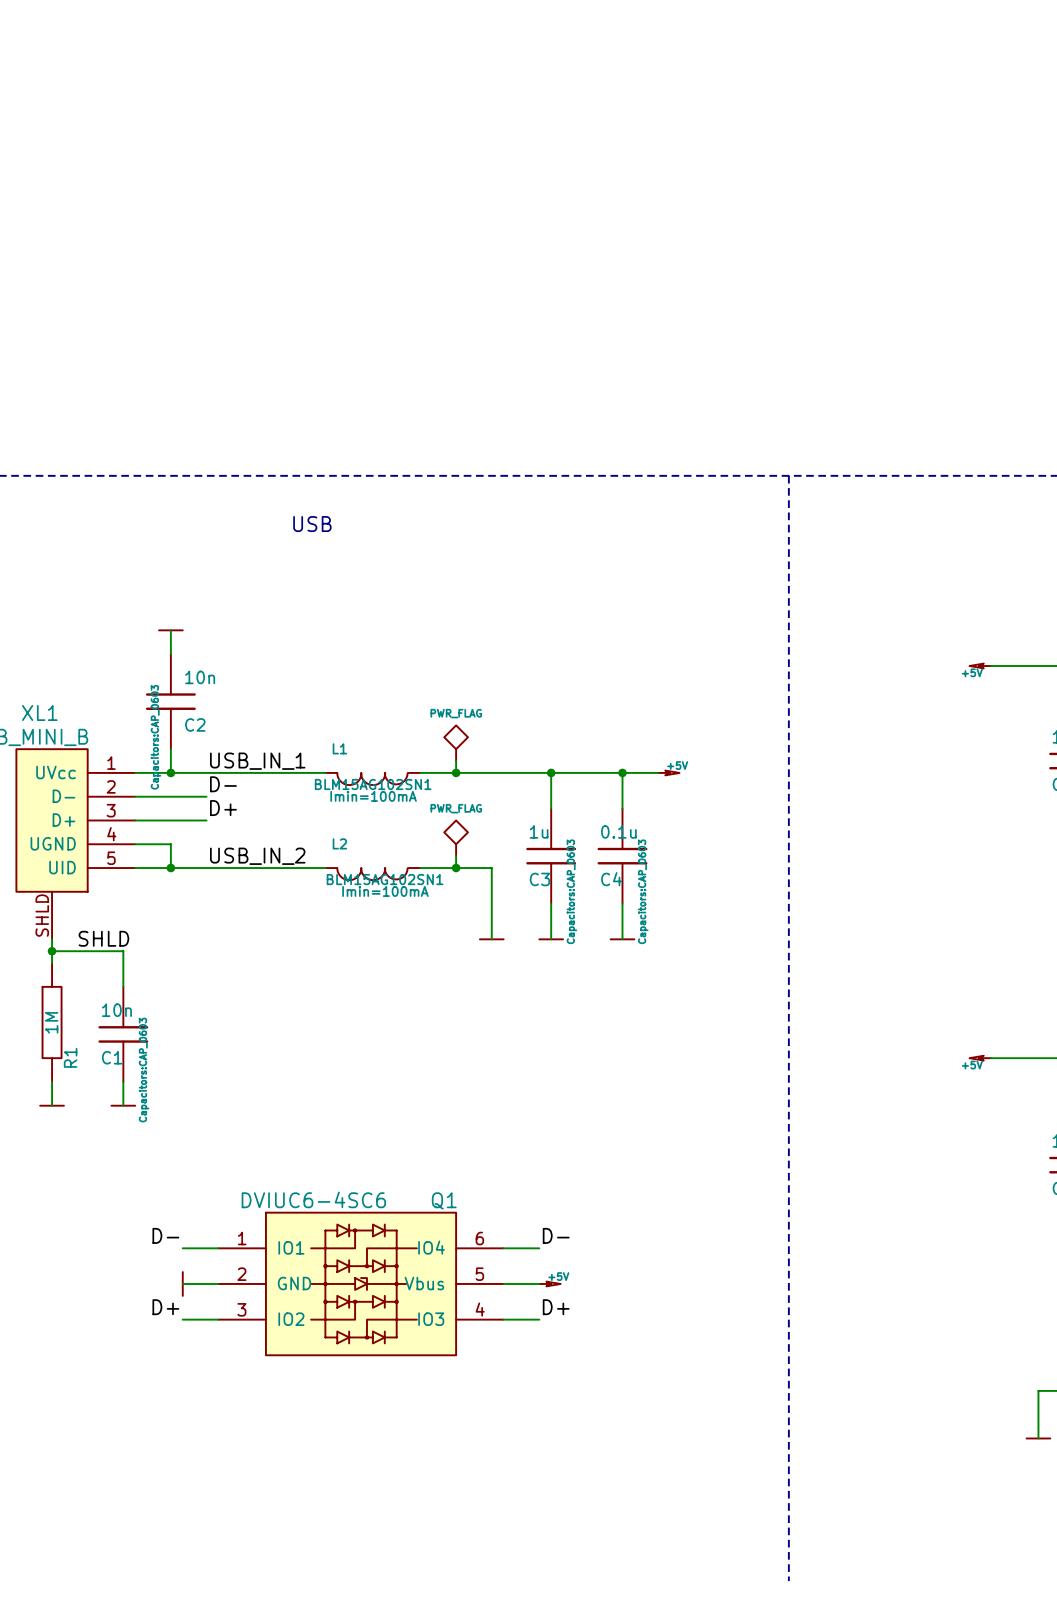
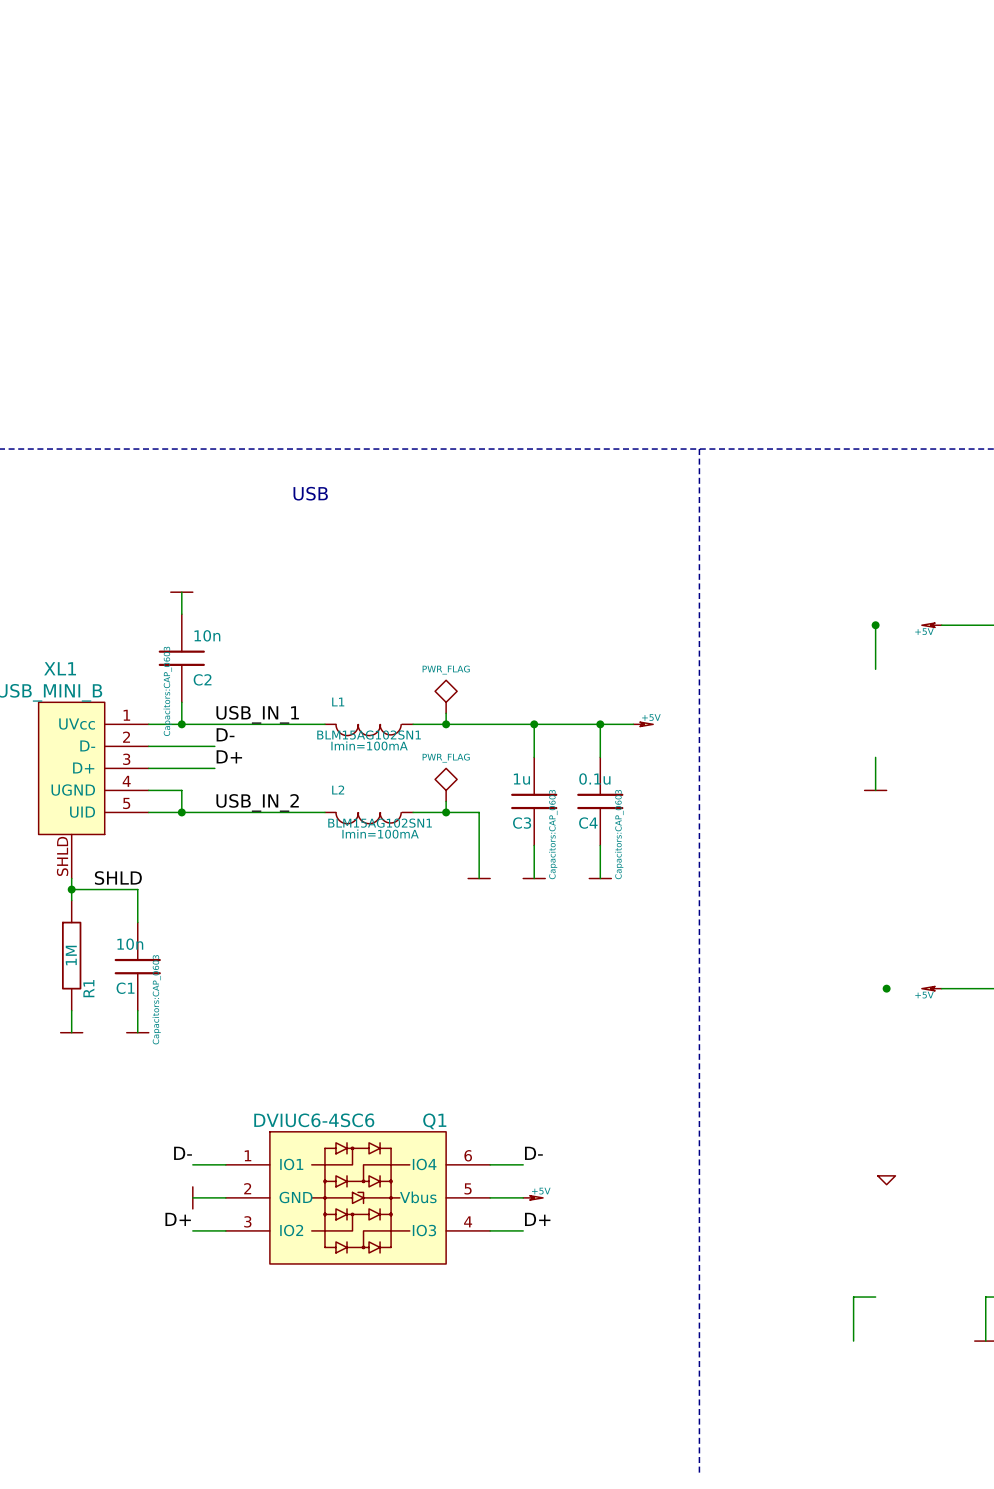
line: (788, 475) (788, 1581) -> (699, 449) (699, 1473)
wire: none -> (875, 625) (875, 669)
junction: none -> (875, 625)
wire: none -> (875, 757) (875, 790)
power symbol: none -> (875, 790)
junction: none -> (886, 988)
power symbol: none -> (886, 1180)
wire: none -> (875, 1297) (853, 1297) (853, 1341)

